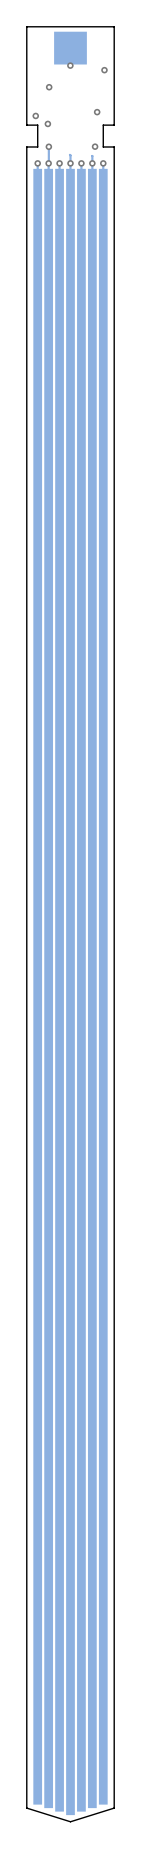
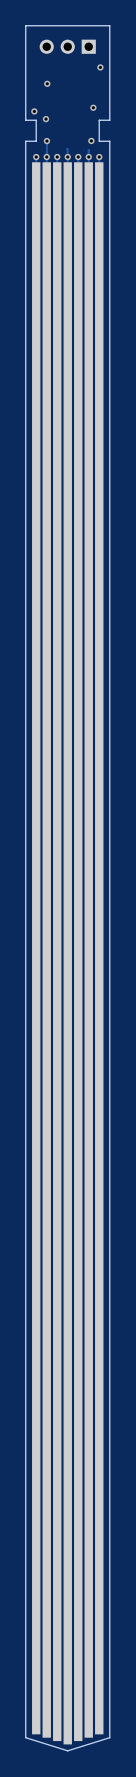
part footprint: [54, 31, 87, 65] -> [39, 39, 96, 54]
via: (70, 65) -> none

